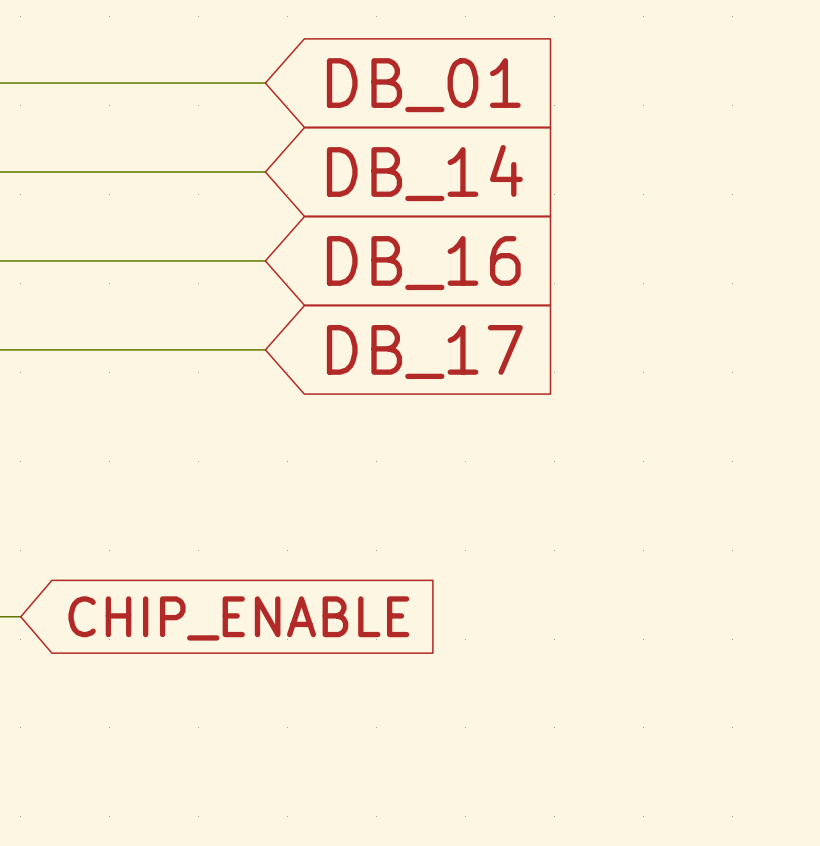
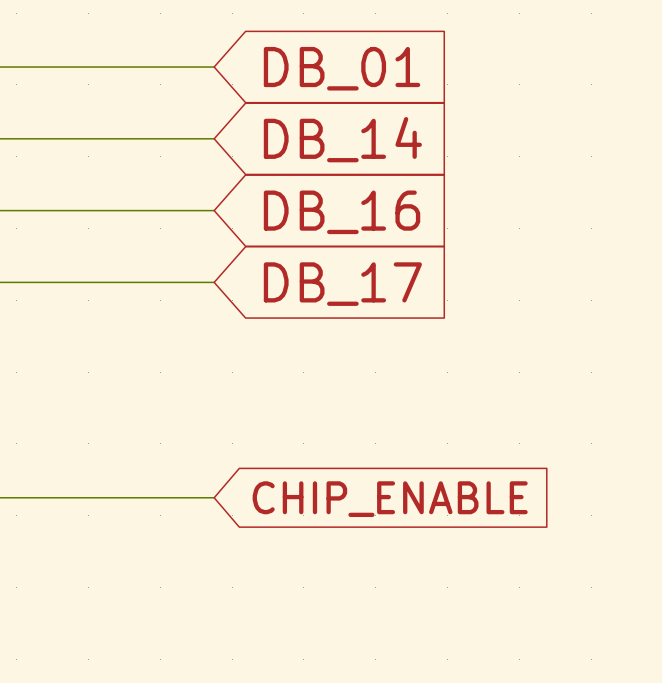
wire: none -> (16, 497) (214, 497)
global label position: CHIP_ENABLE (238, 618) -> CHIP_ENABLE (390, 499)

